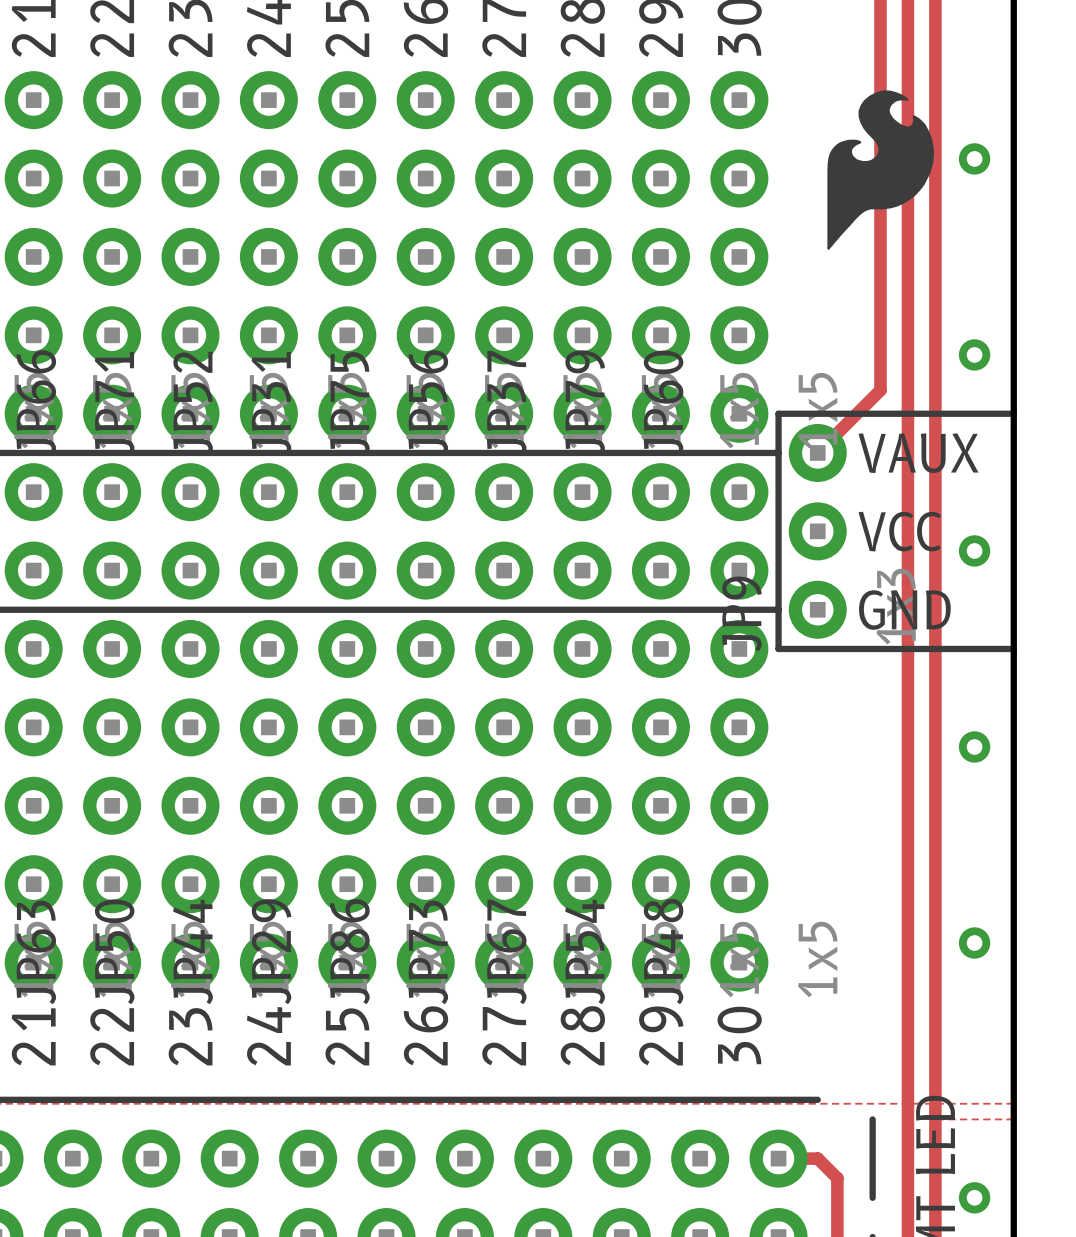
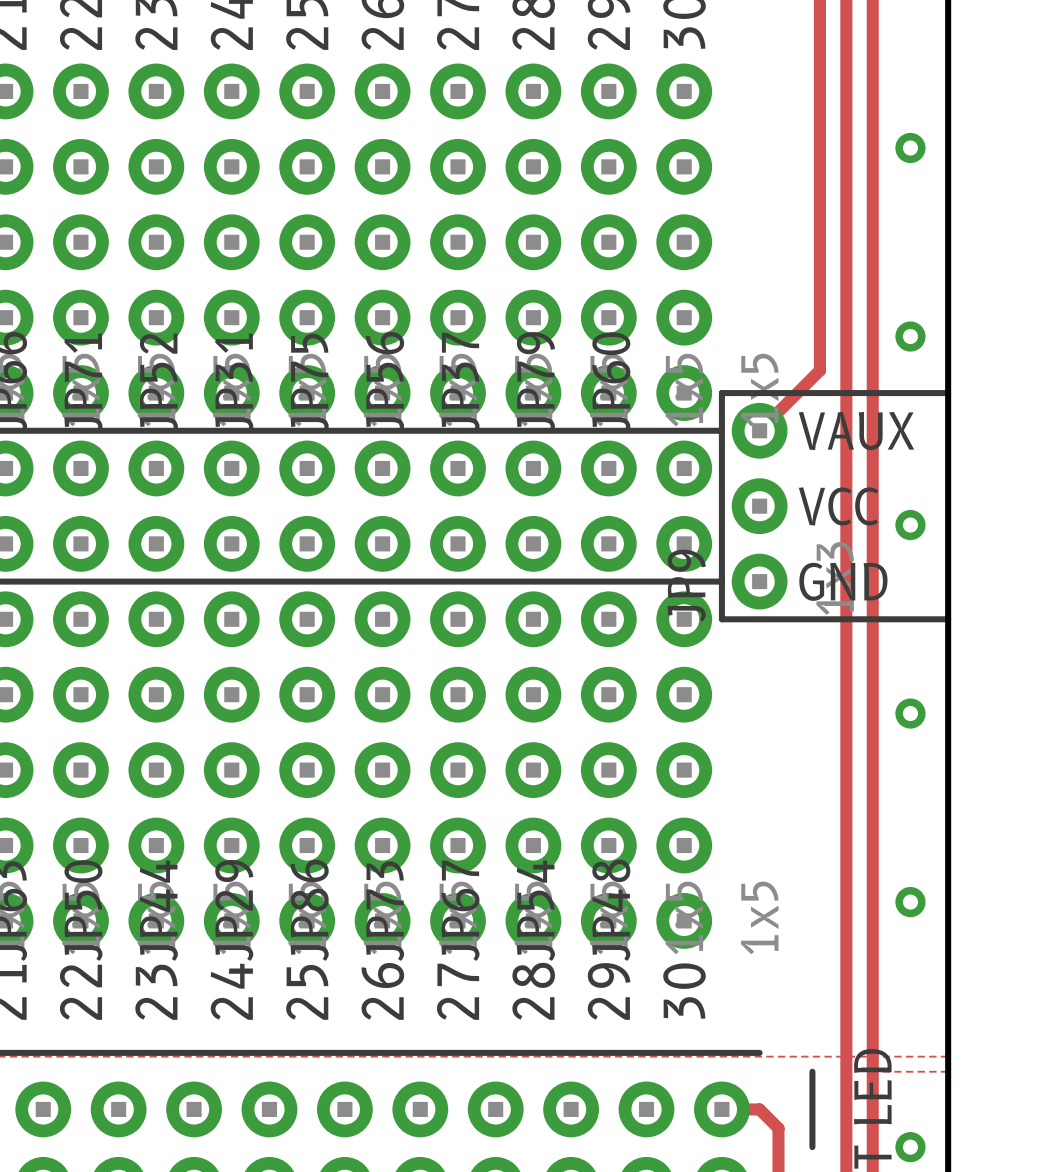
drawing: [827, 90, 935, 250] -> none

